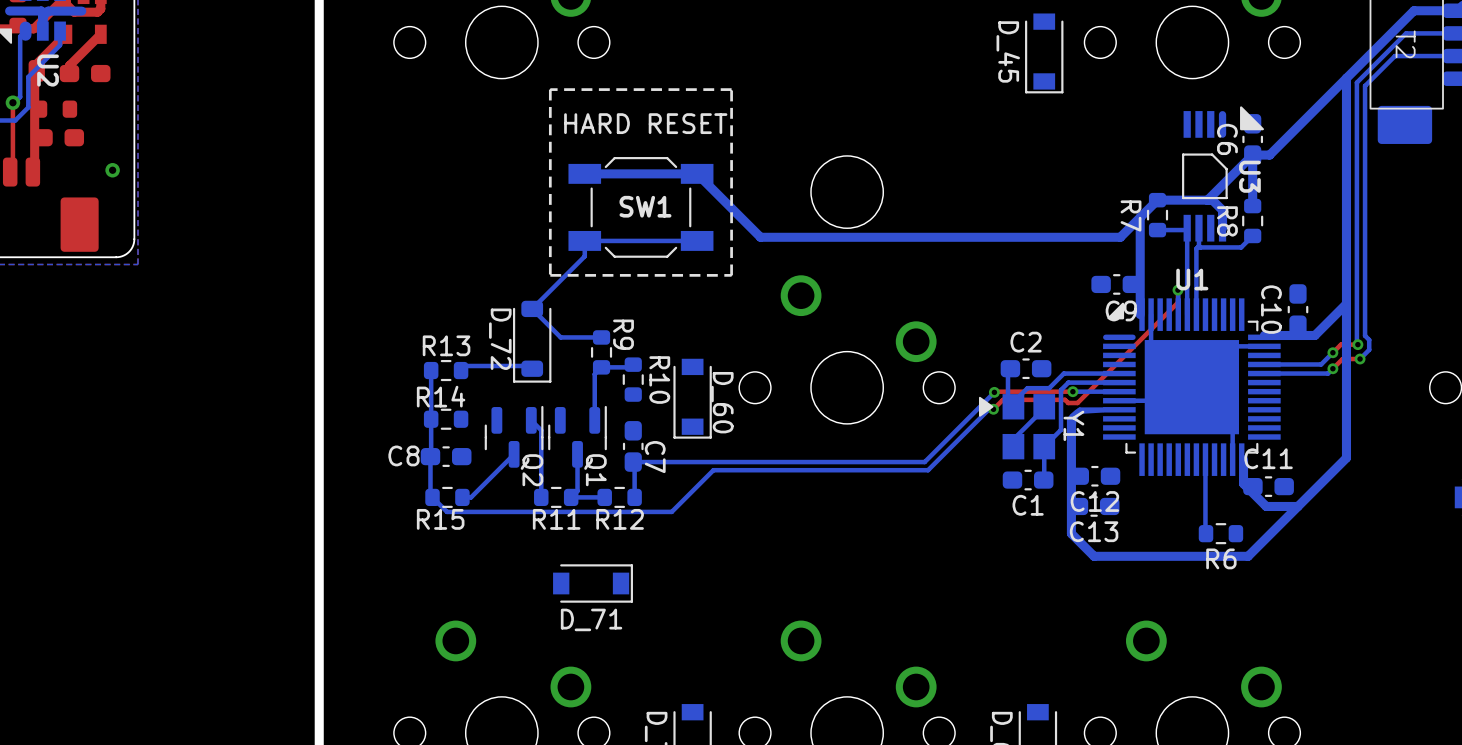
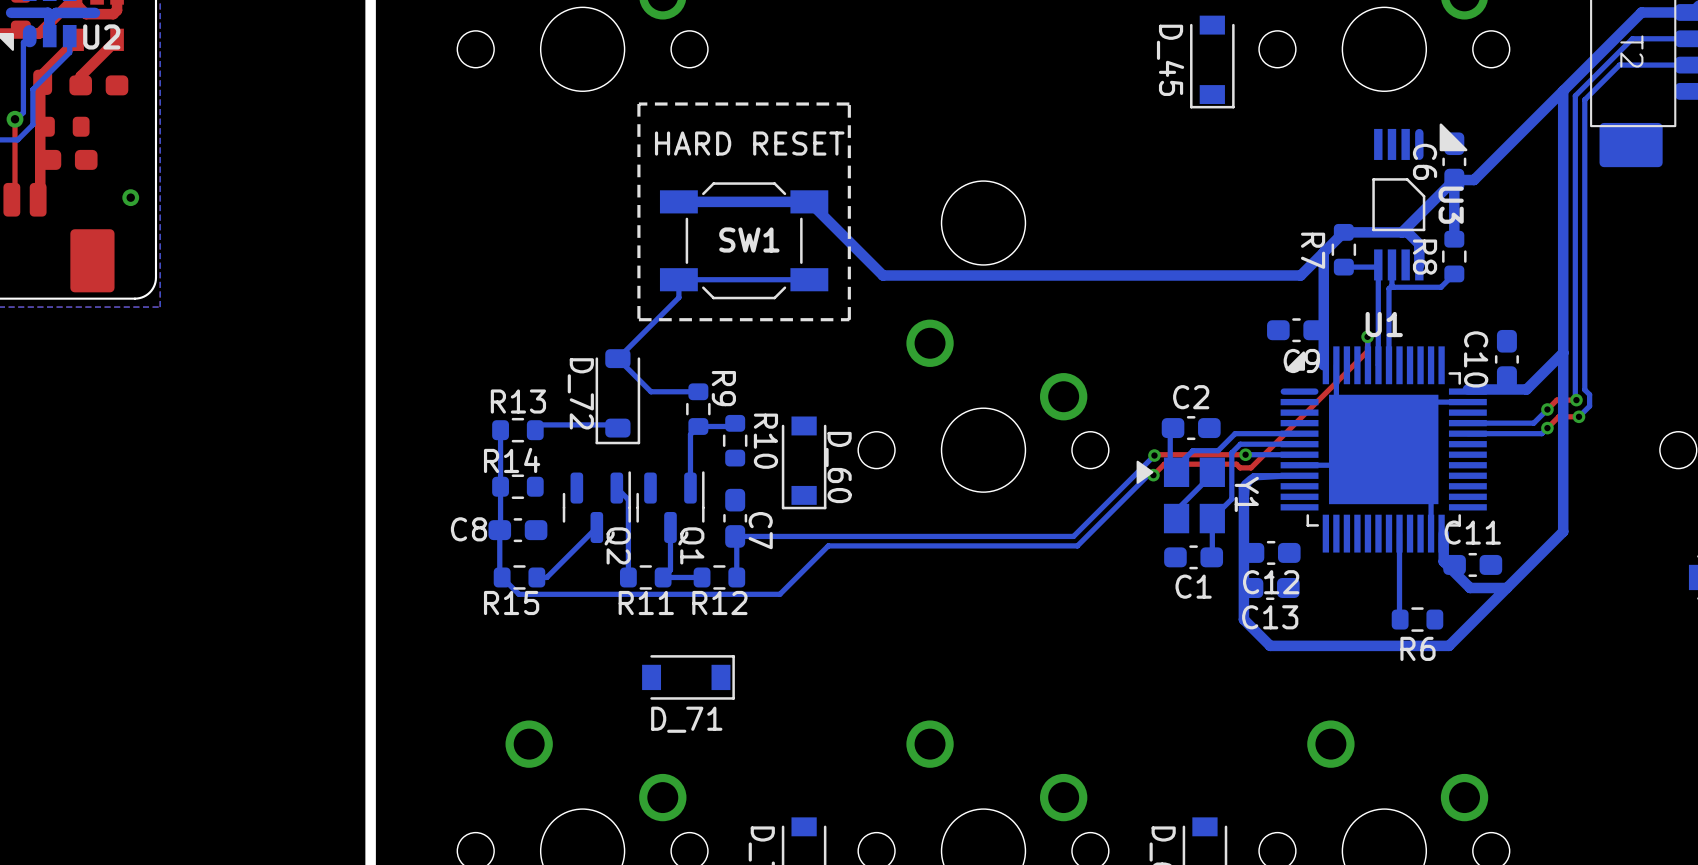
U2 name rotation: 0° (48, 70) -> 90° counterclockwise (101, 36)
U2 name position: U2 (48, 70) -> U2 (101, 36)

